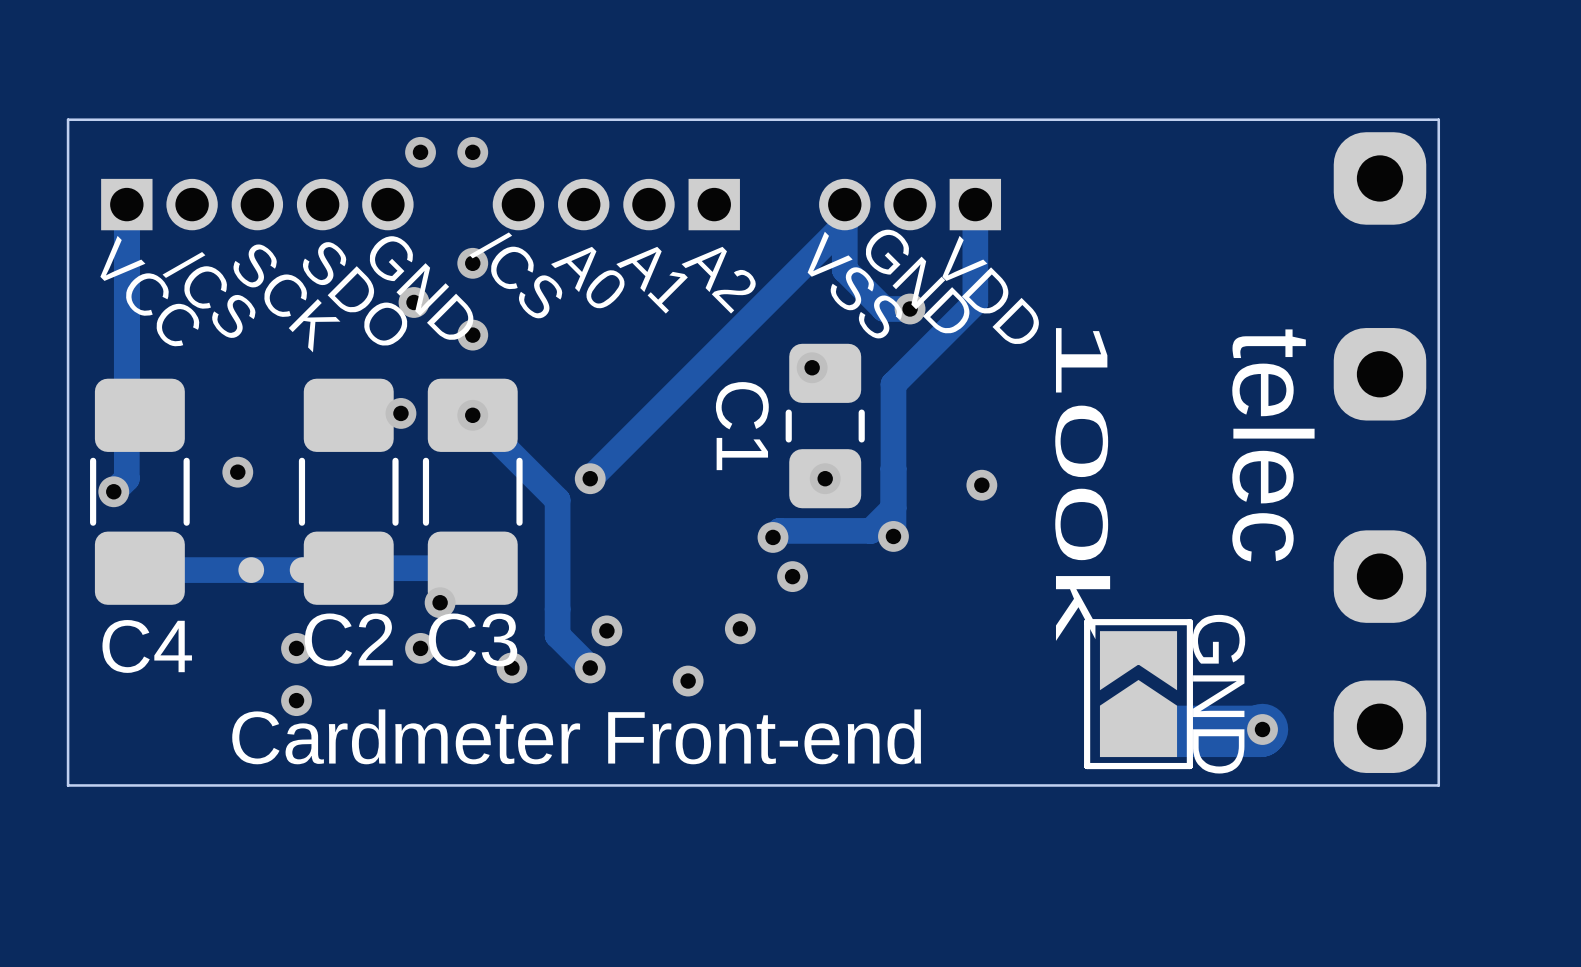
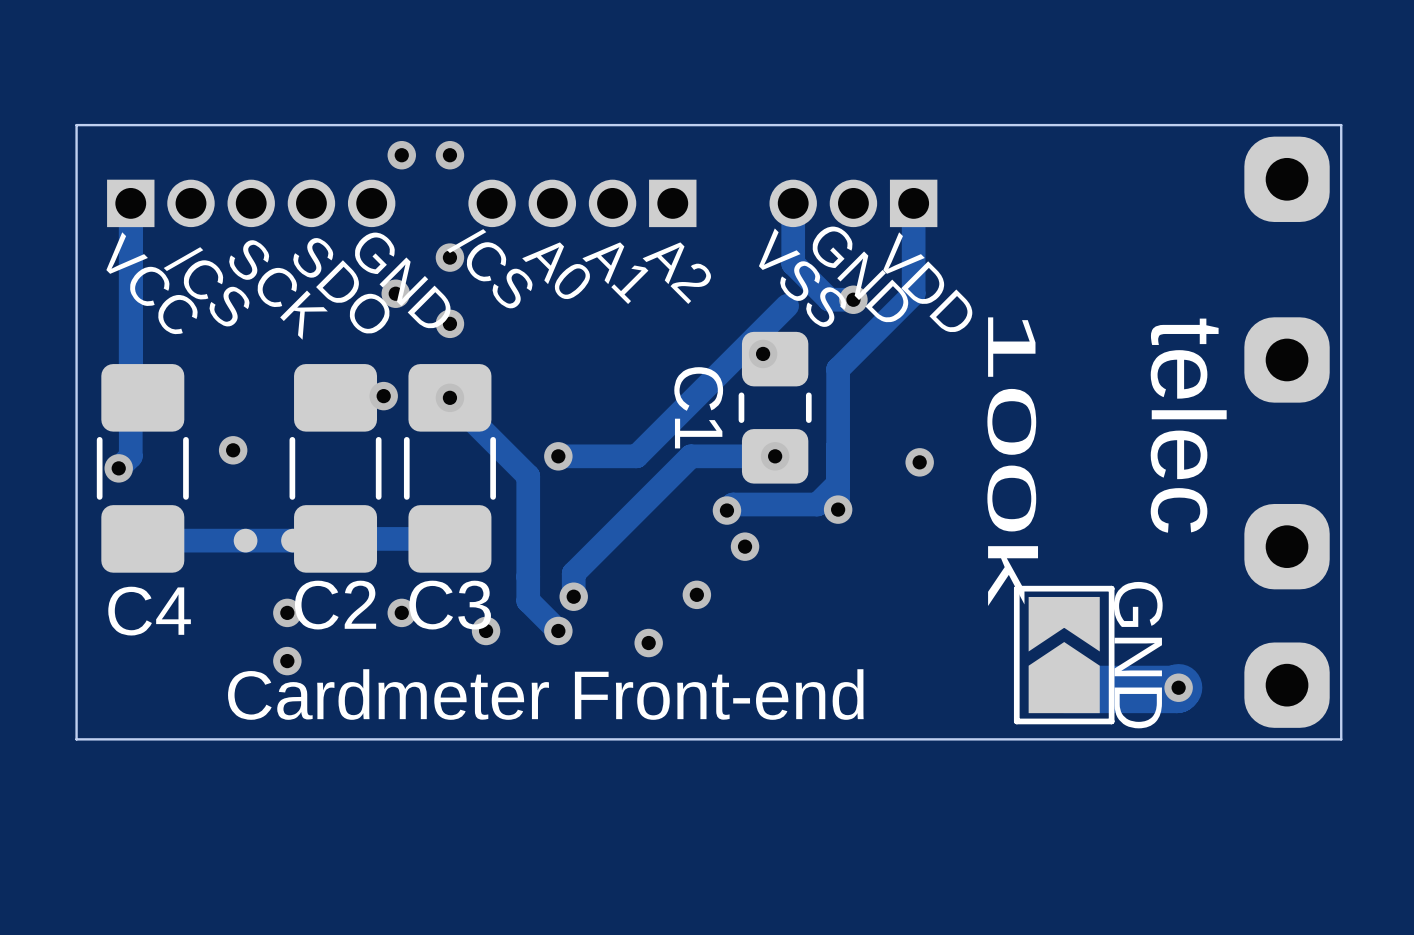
track: (844, 224) (590, 478) -> (787, 305) (636, 456) (558, 456)
track: none -> (775, 456) (690, 456) (573, 573) (573, 596)
via: (440, 602) -> none

